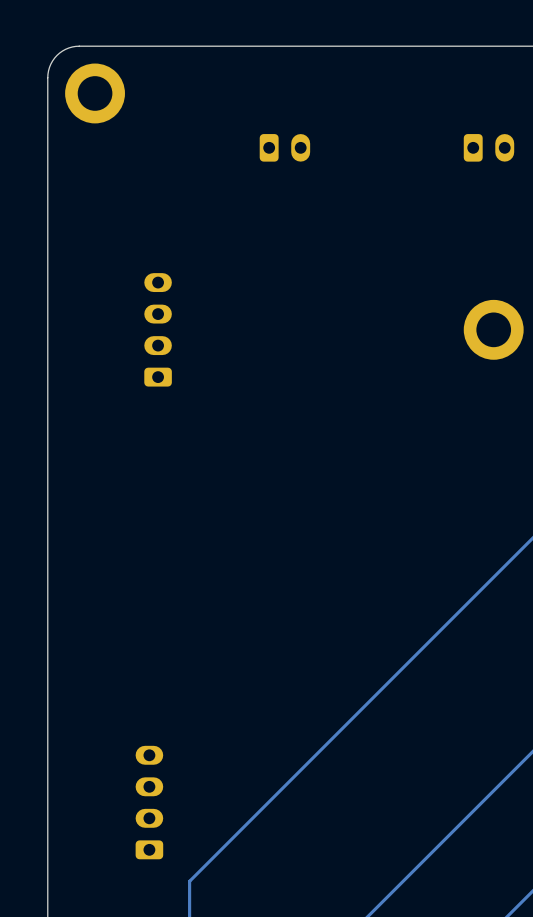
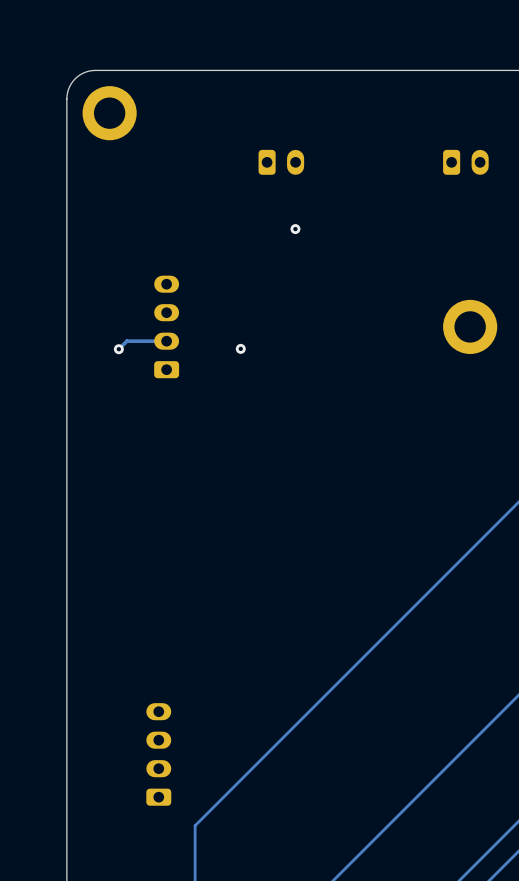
via: none -> (295, 229)
track: none -> (166, 341) (126, 341) (118, 349)
via: none -> (118, 349)
via: none -> (240, 348)

